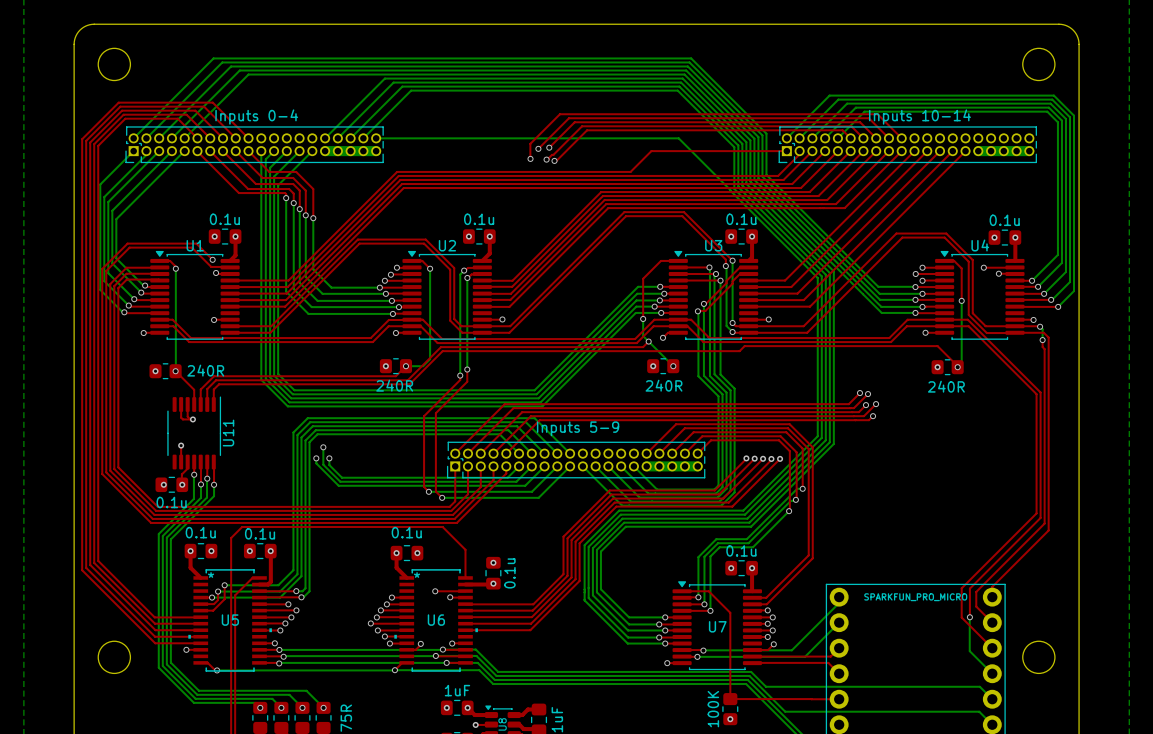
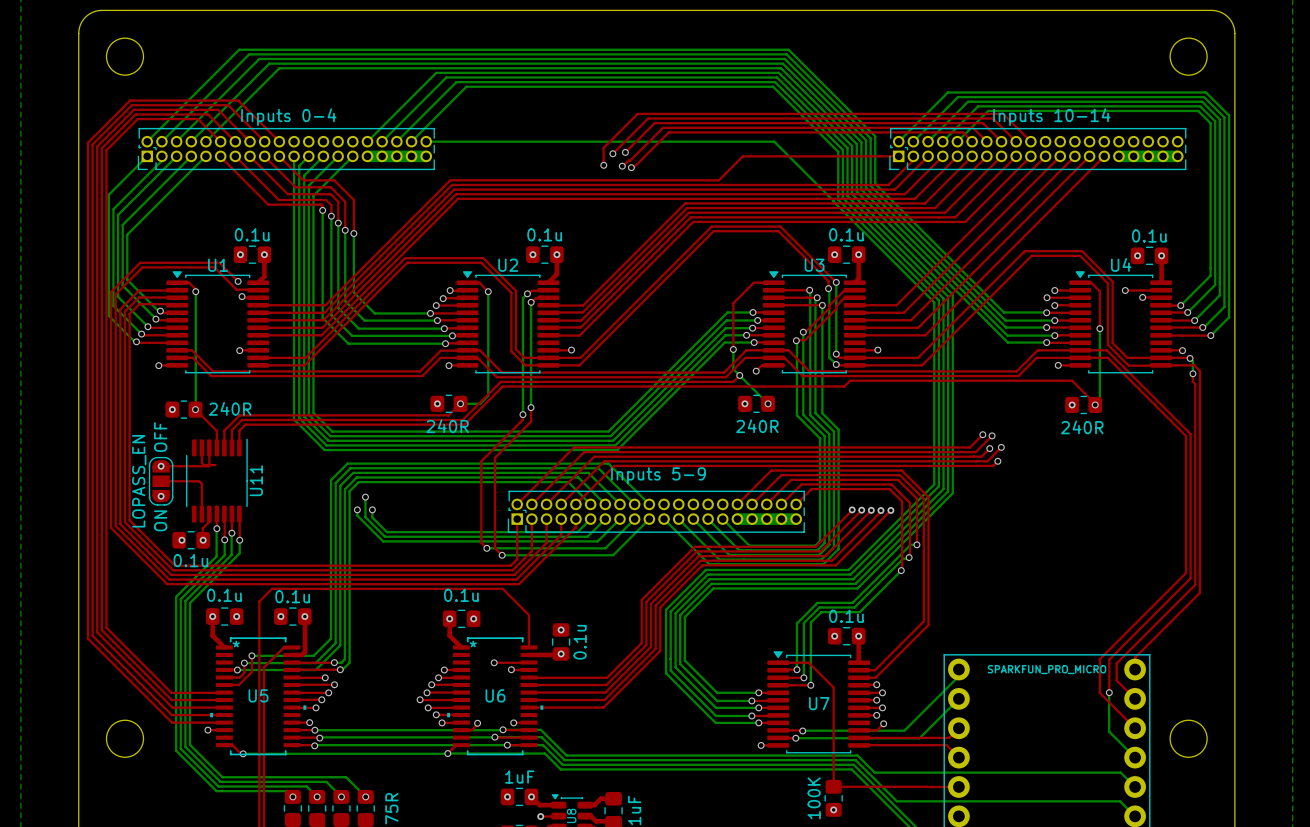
top track: (187, 416) (190, 419) -> (209, 461) (208, 466) (161, 466)
via: (192, 419) -> none
via: none -> (161, 466)
top track: none -> (161, 481) (199, 481) (201, 483) (201, 495)
part: none -> LOPASS_EN (161, 481)
via: (181, 445) -> none
via: none -> (161, 496)

